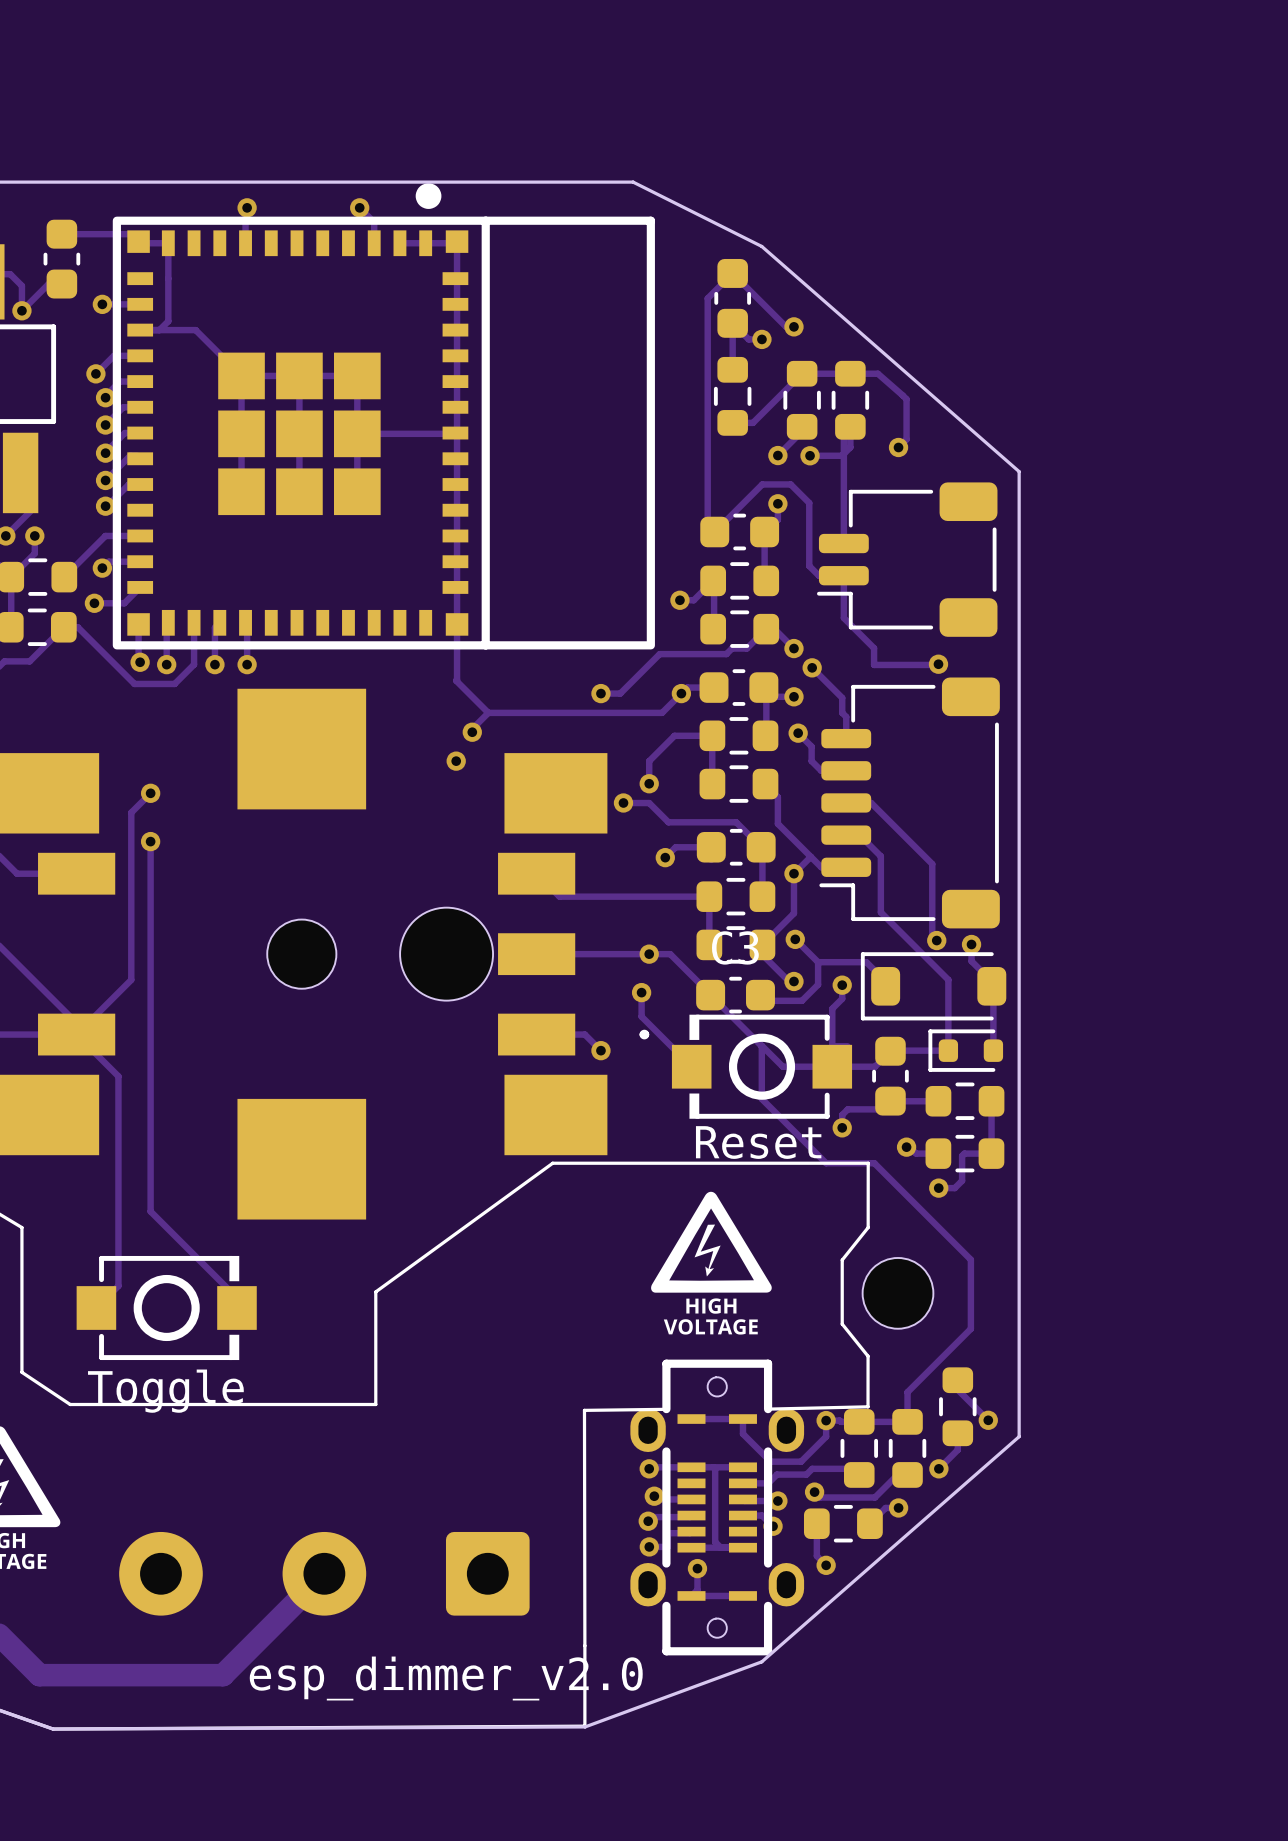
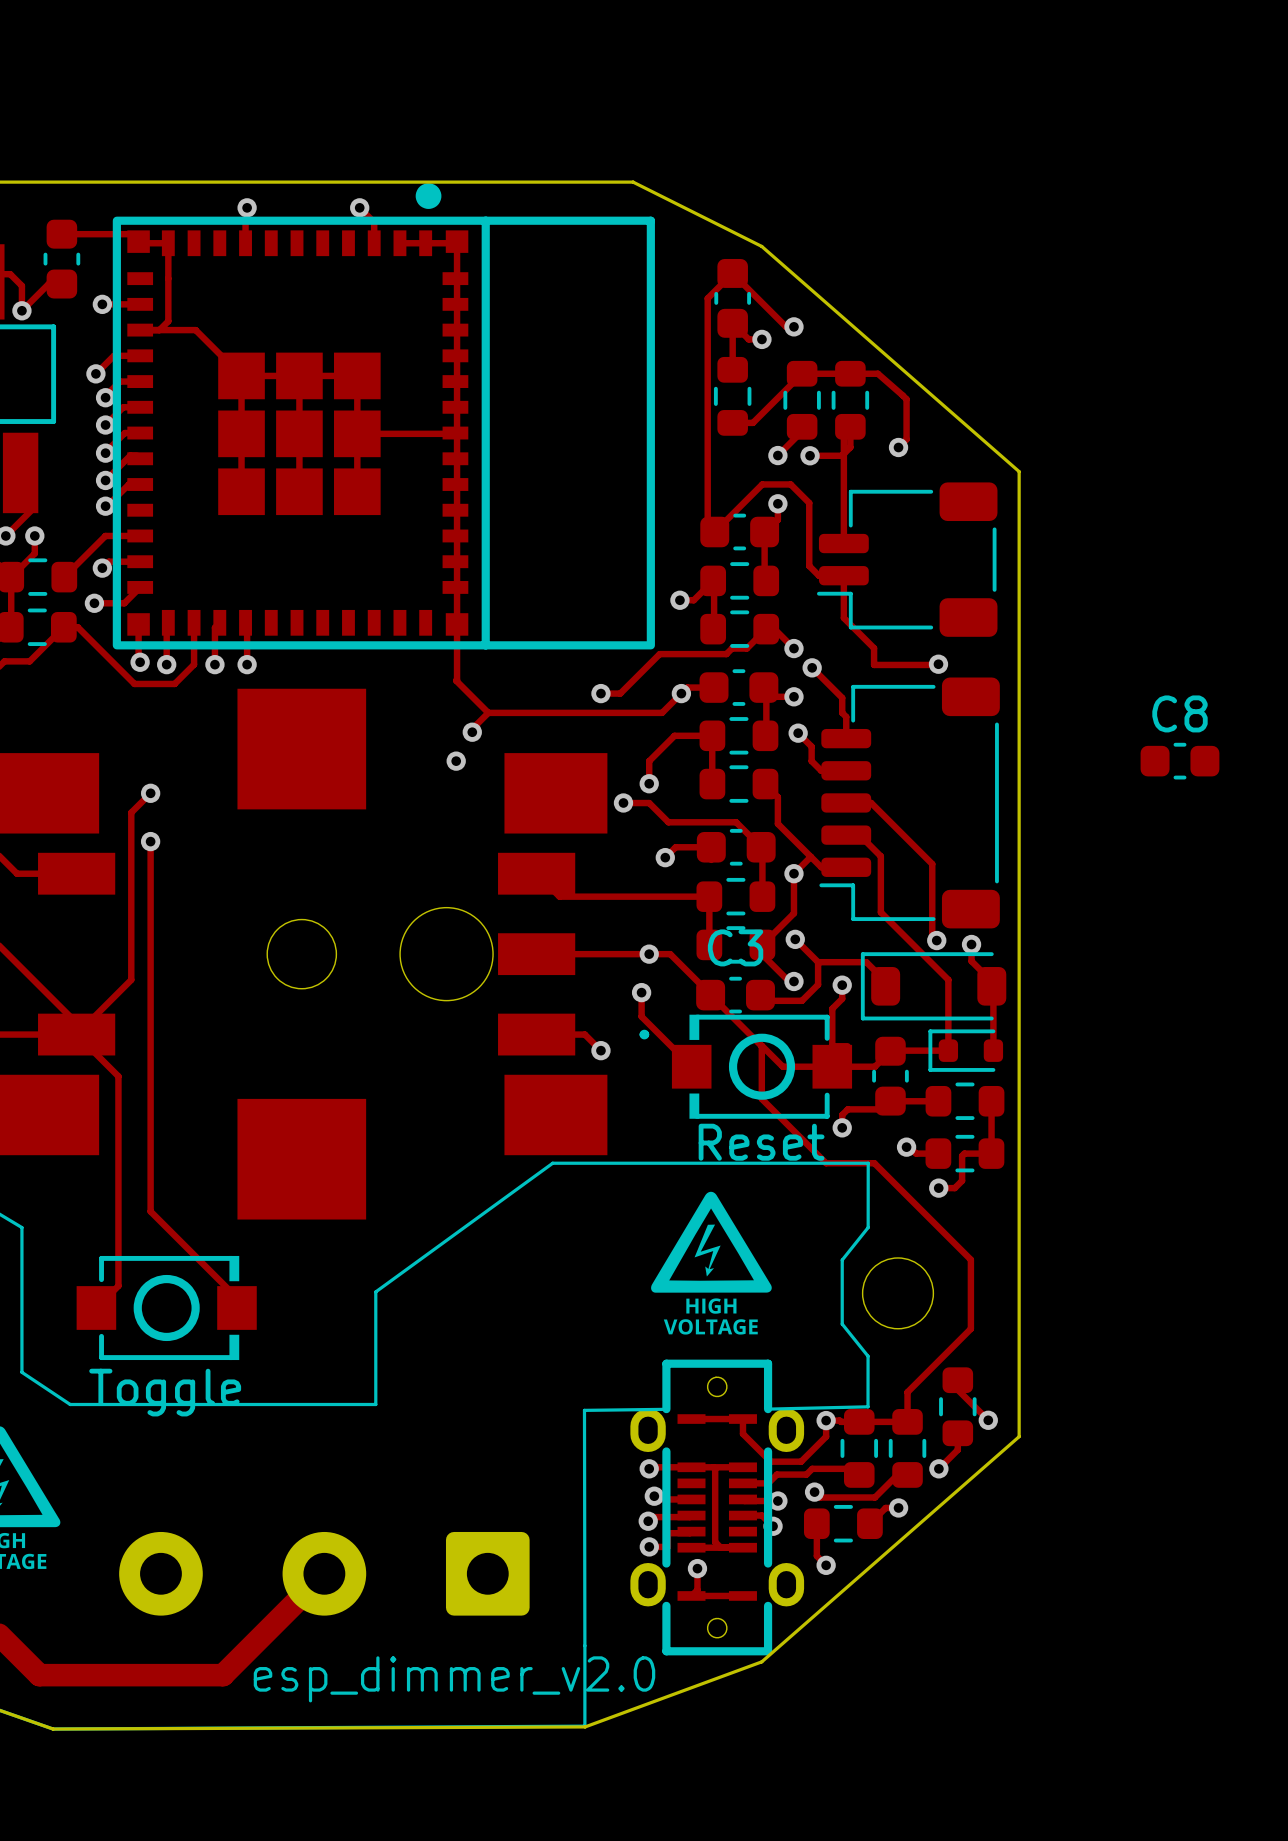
C8: none -> (1179, 761)

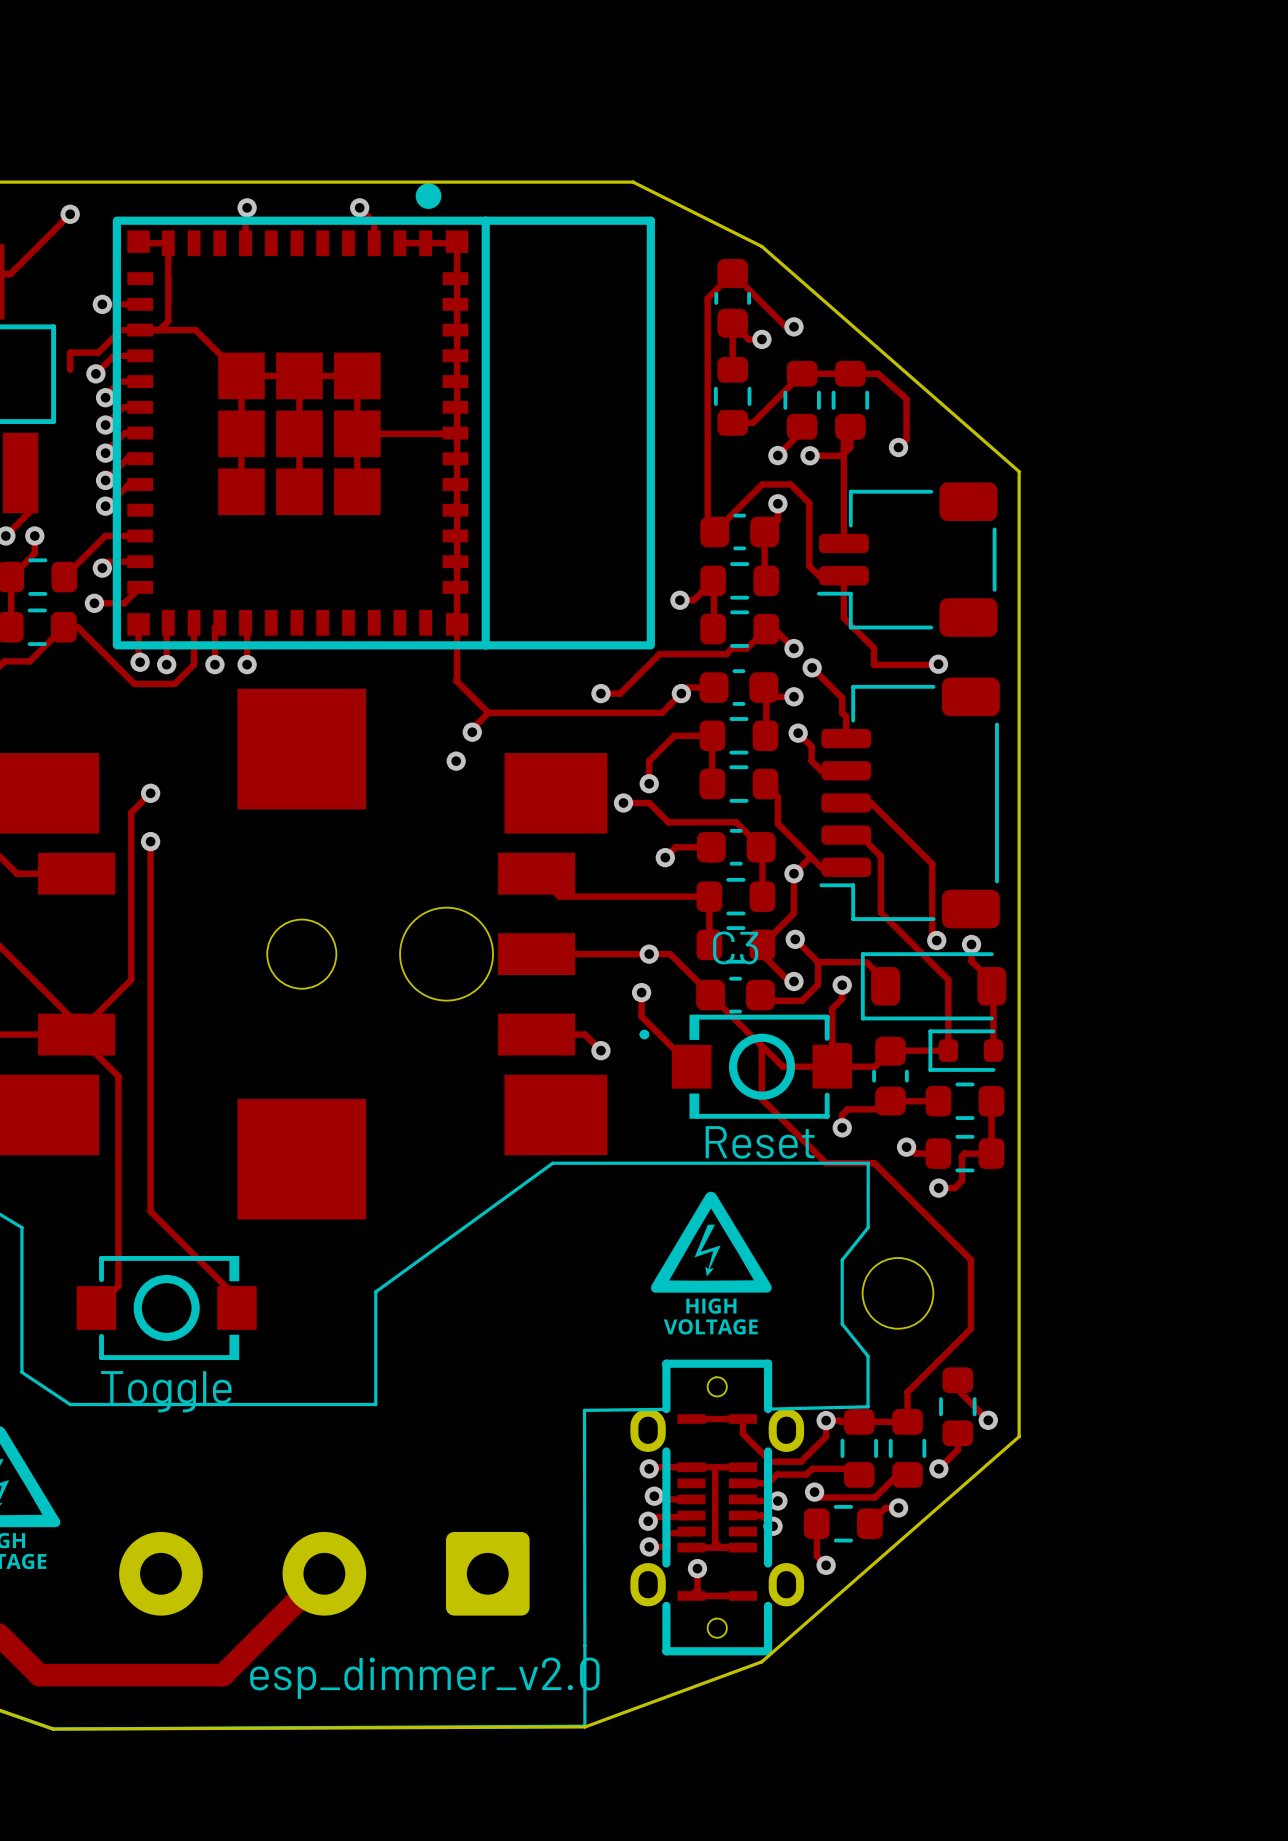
track: (61, 234) (131, 234) (138, 241) -> none
part: (61, 259) -> none
track: (10, 274) (21, 285) (21, 310) (48, 284) (61, 284) -> (10, 274) (70, 214)
via position: (21, 310) -> (70, 214)
track: none -> (140, 330) (120, 330) (98, 352) (70, 352) (70, 369)
C8: (1179, 761) -> none

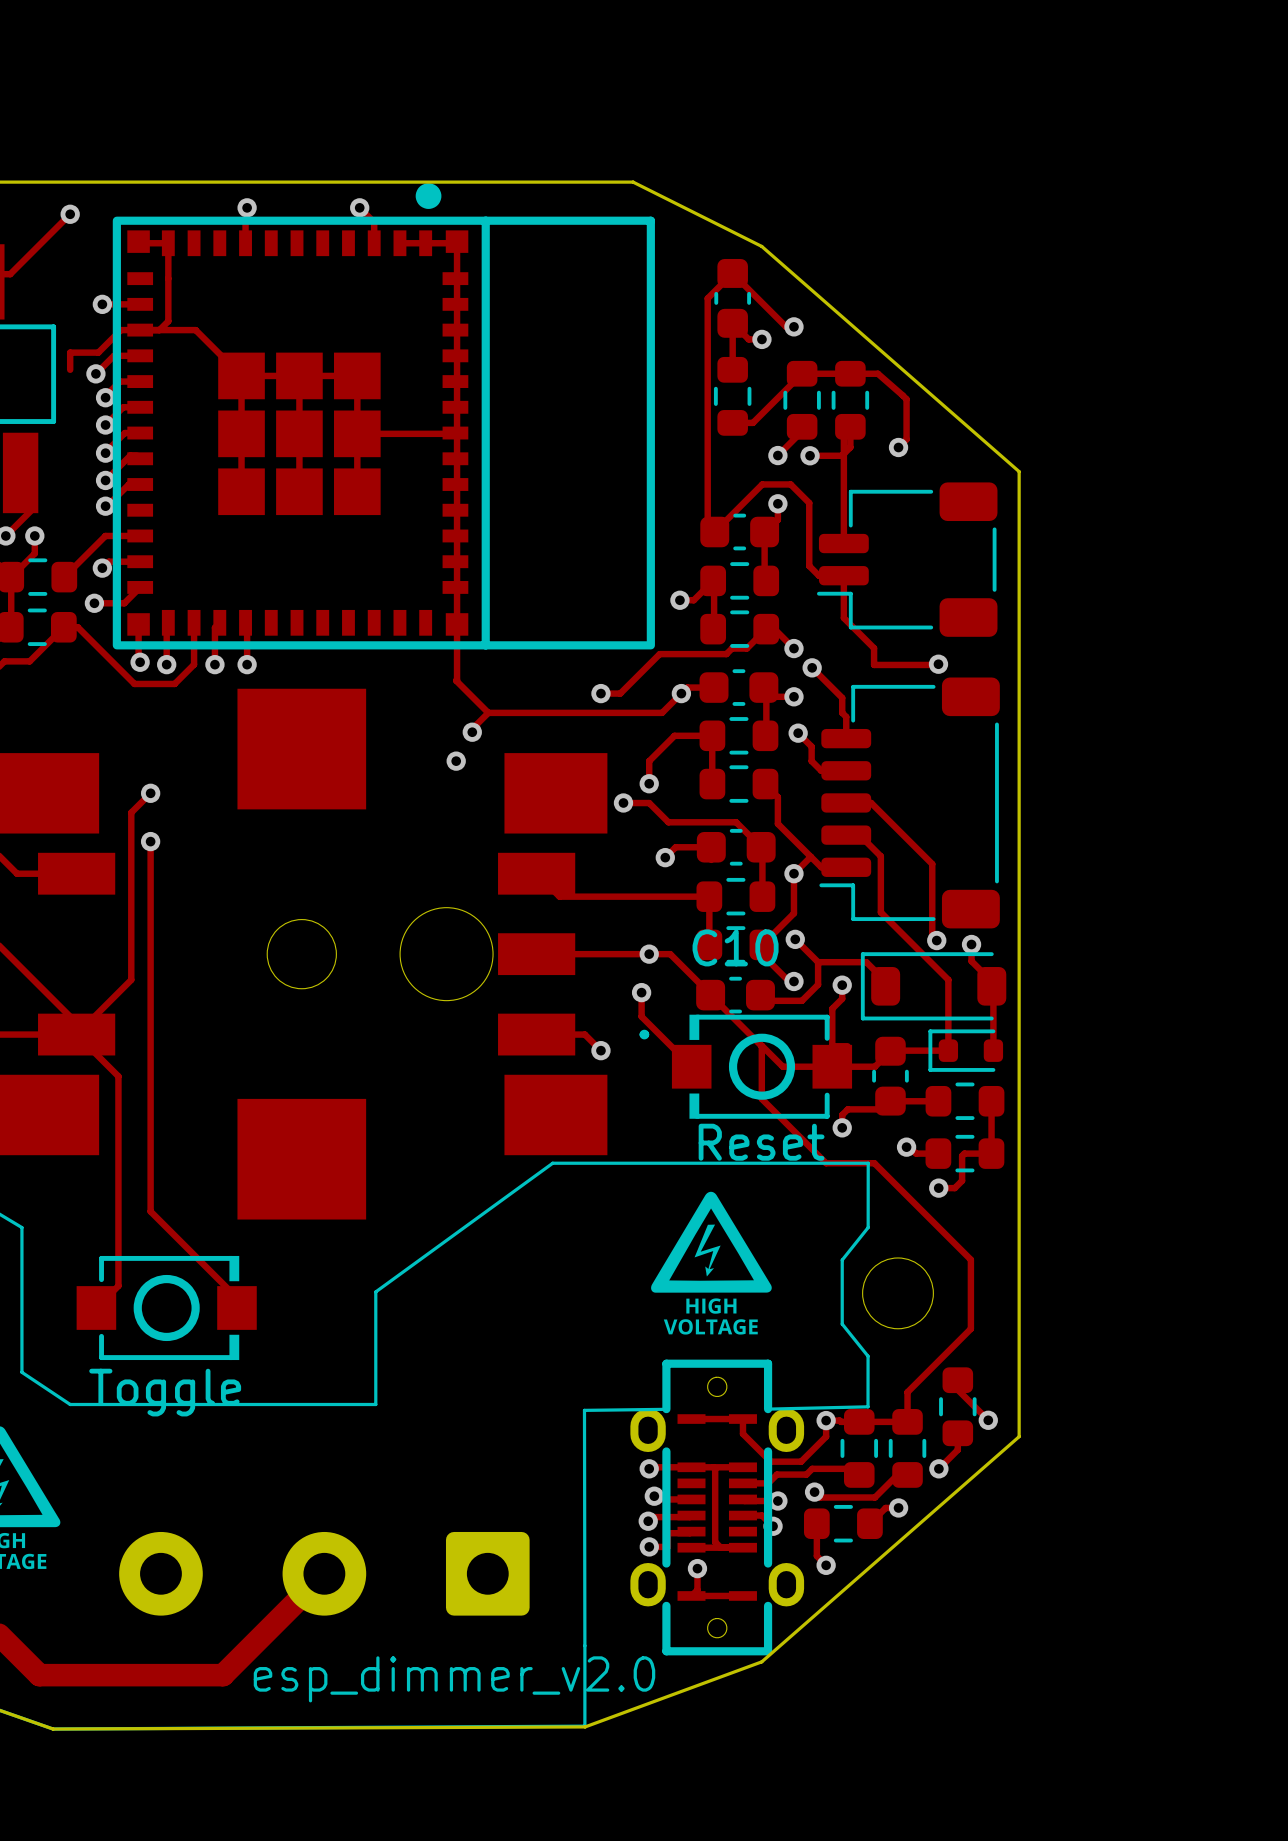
C3 name: C3 (735, 947) -> C10 (735, 947)

